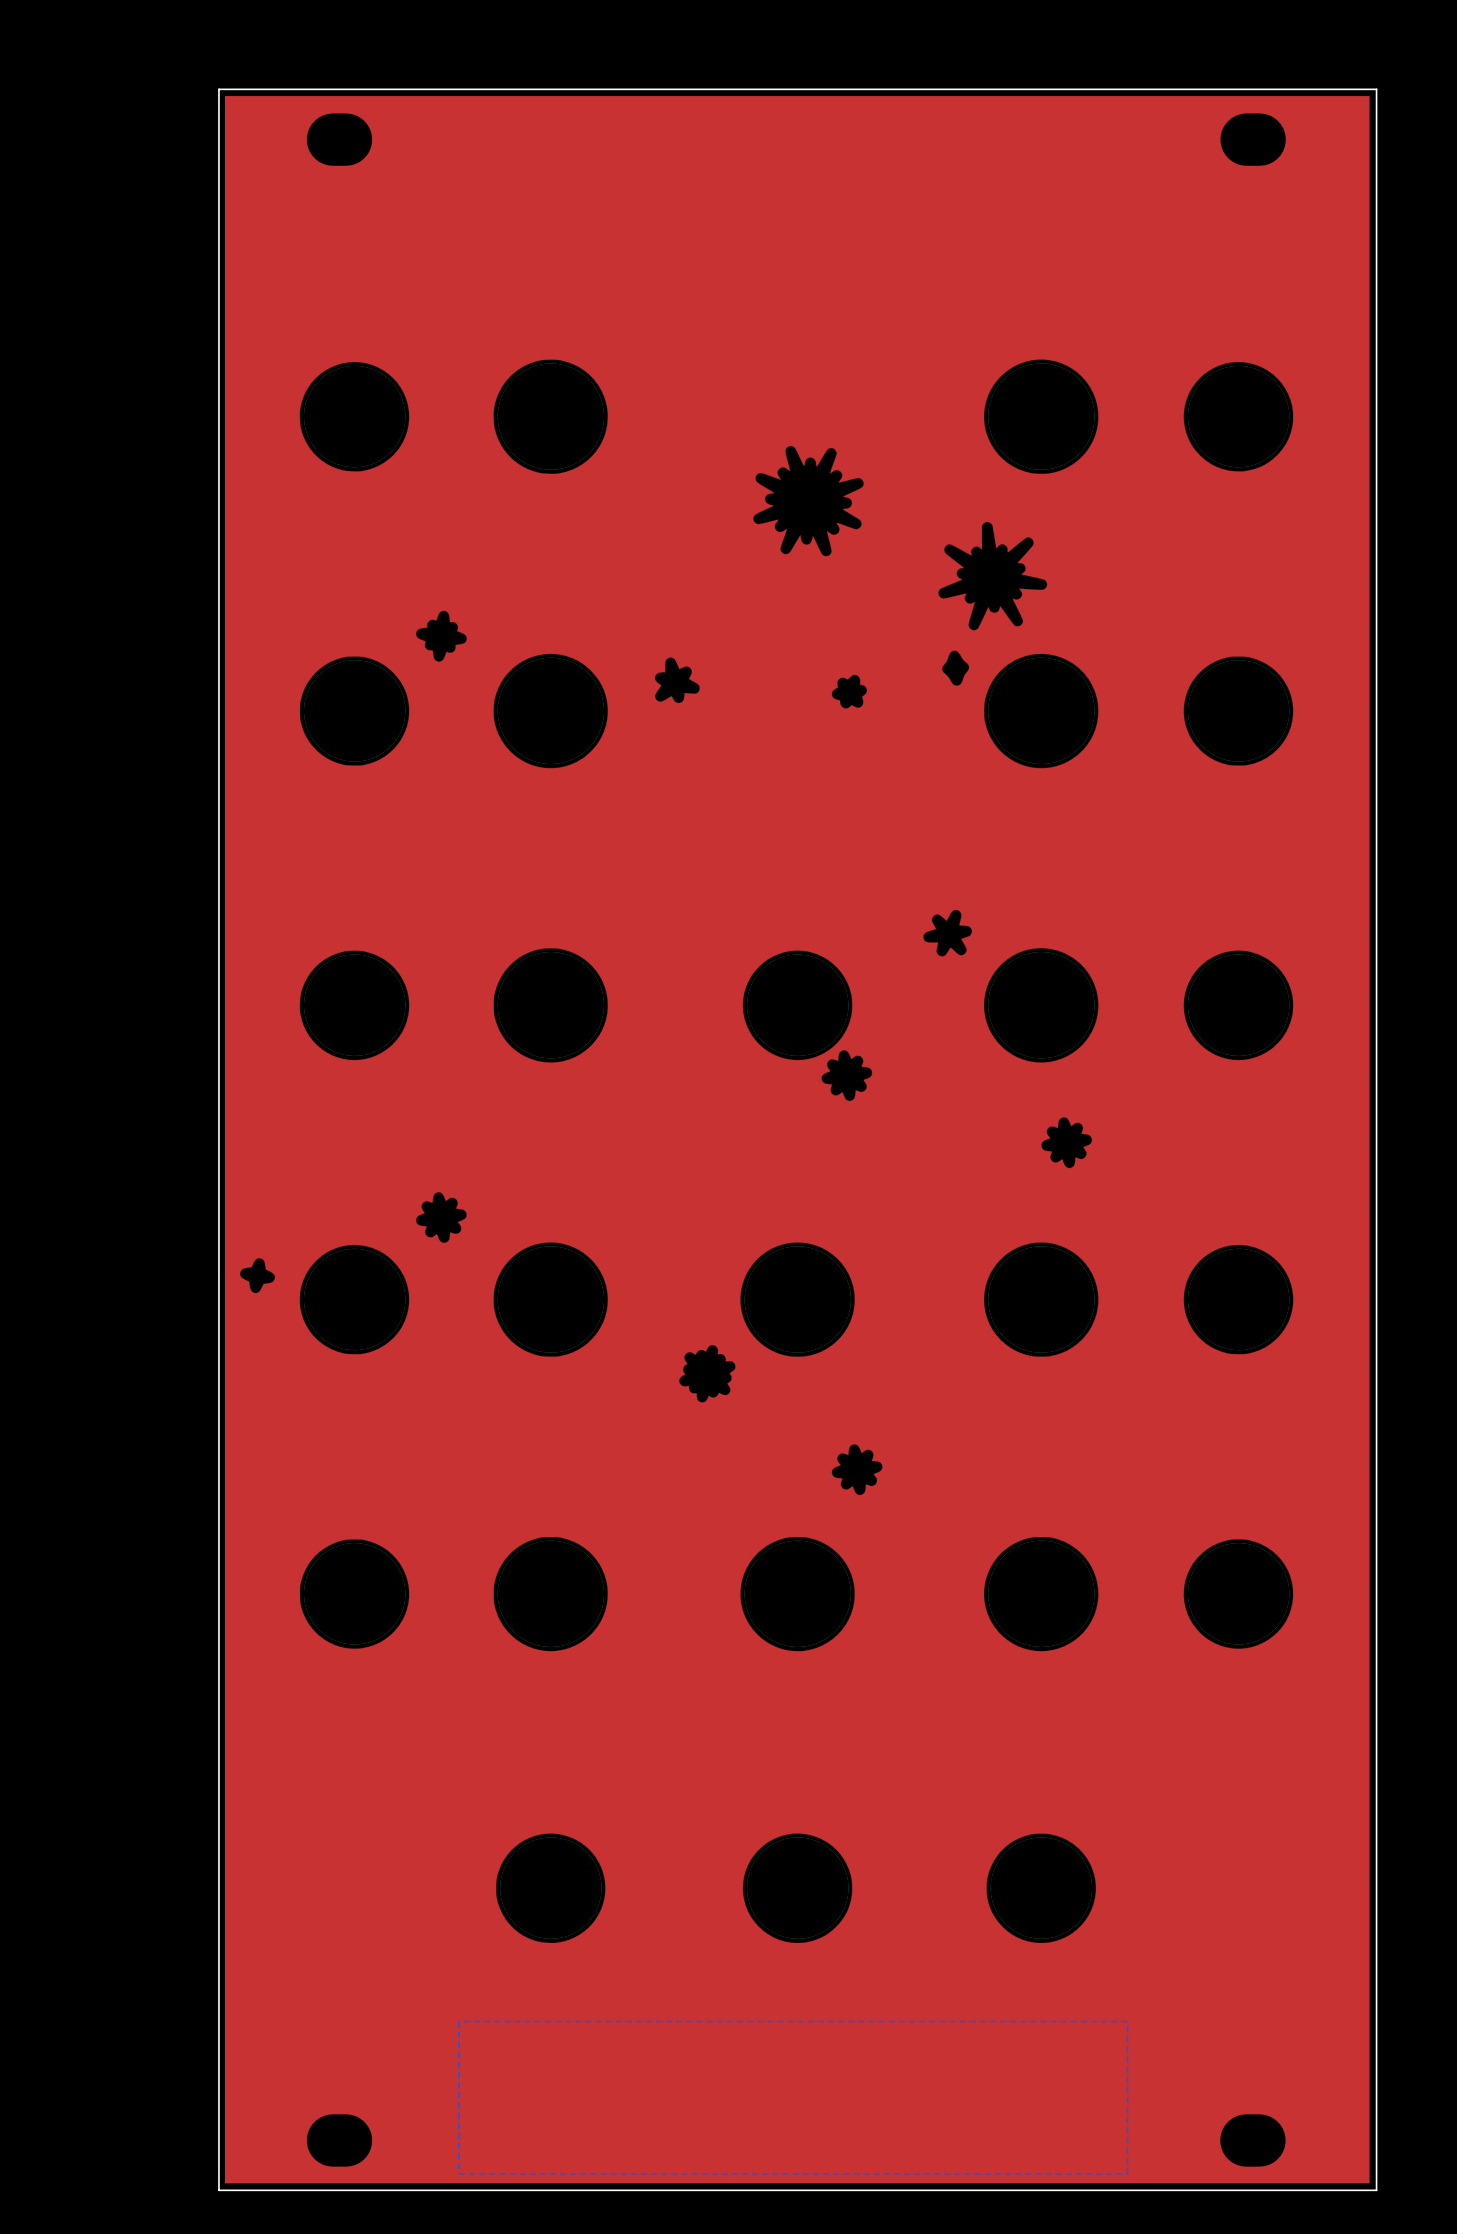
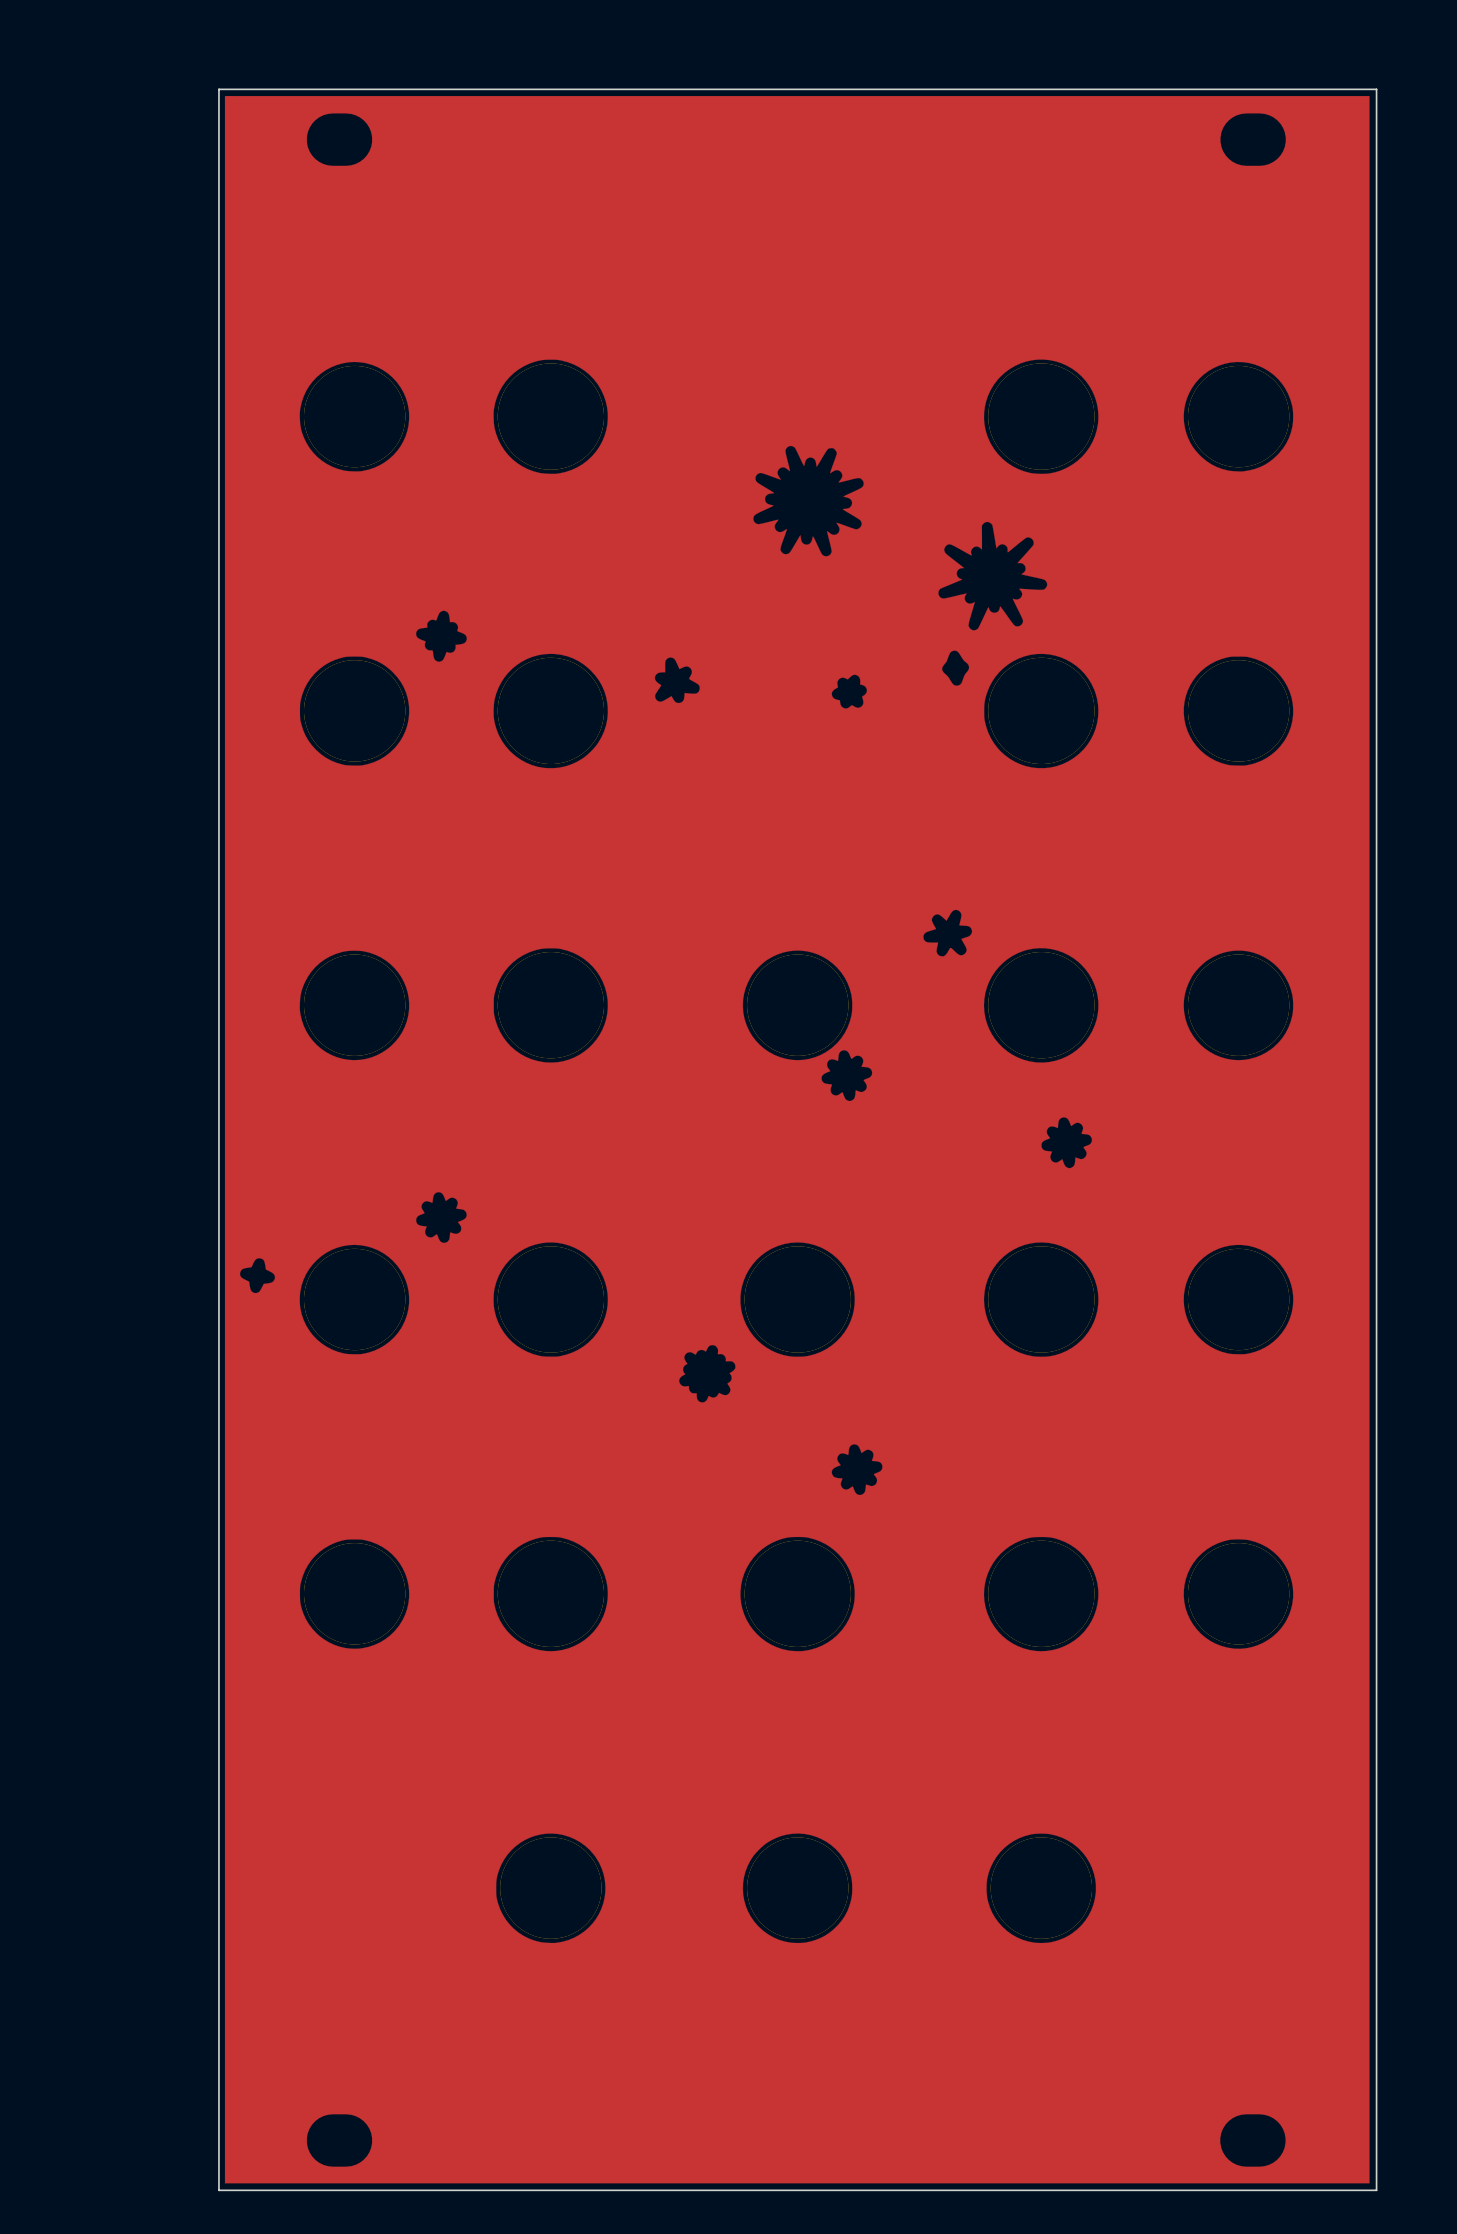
bottom zone outline: (1127, 2021) (1127, 2173) (458, 2173) (458, 2021) (1127, 2021) -> none

